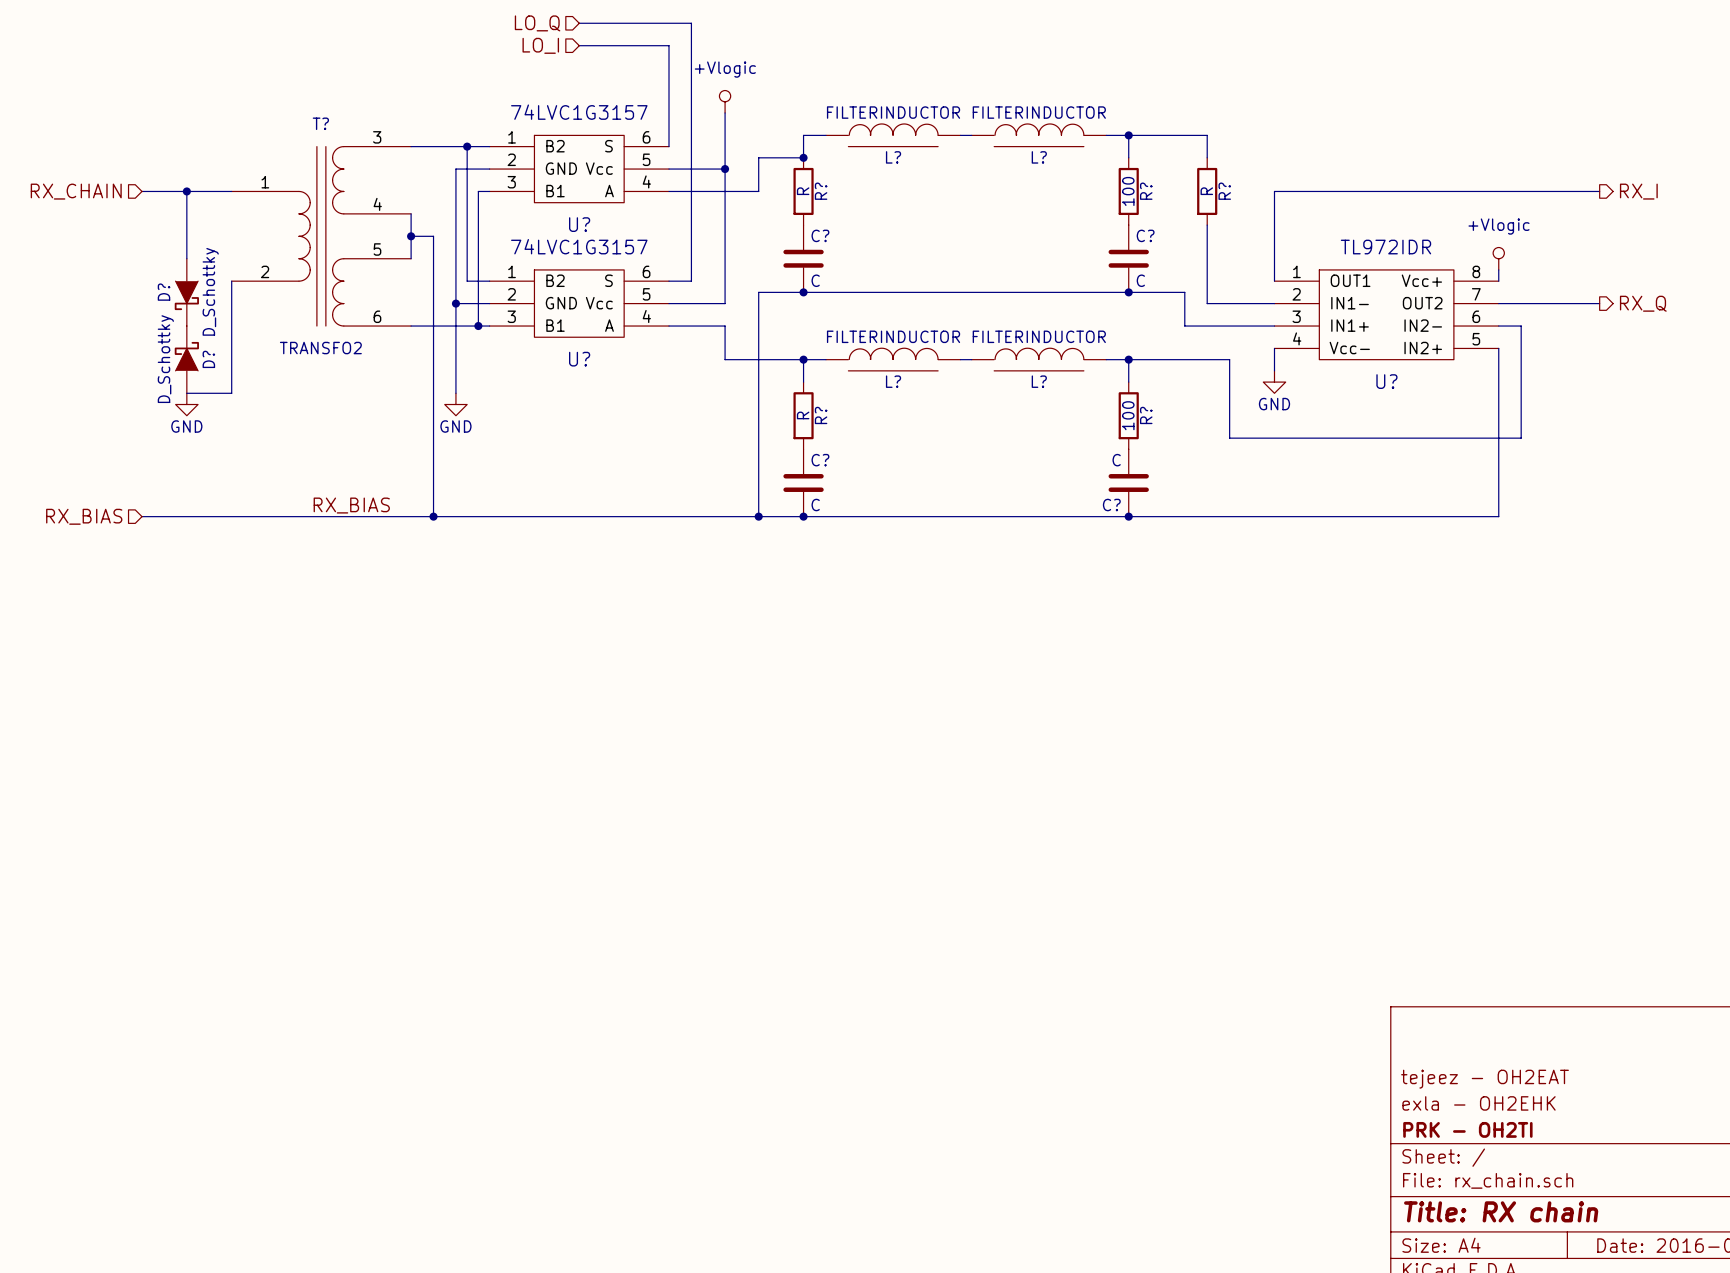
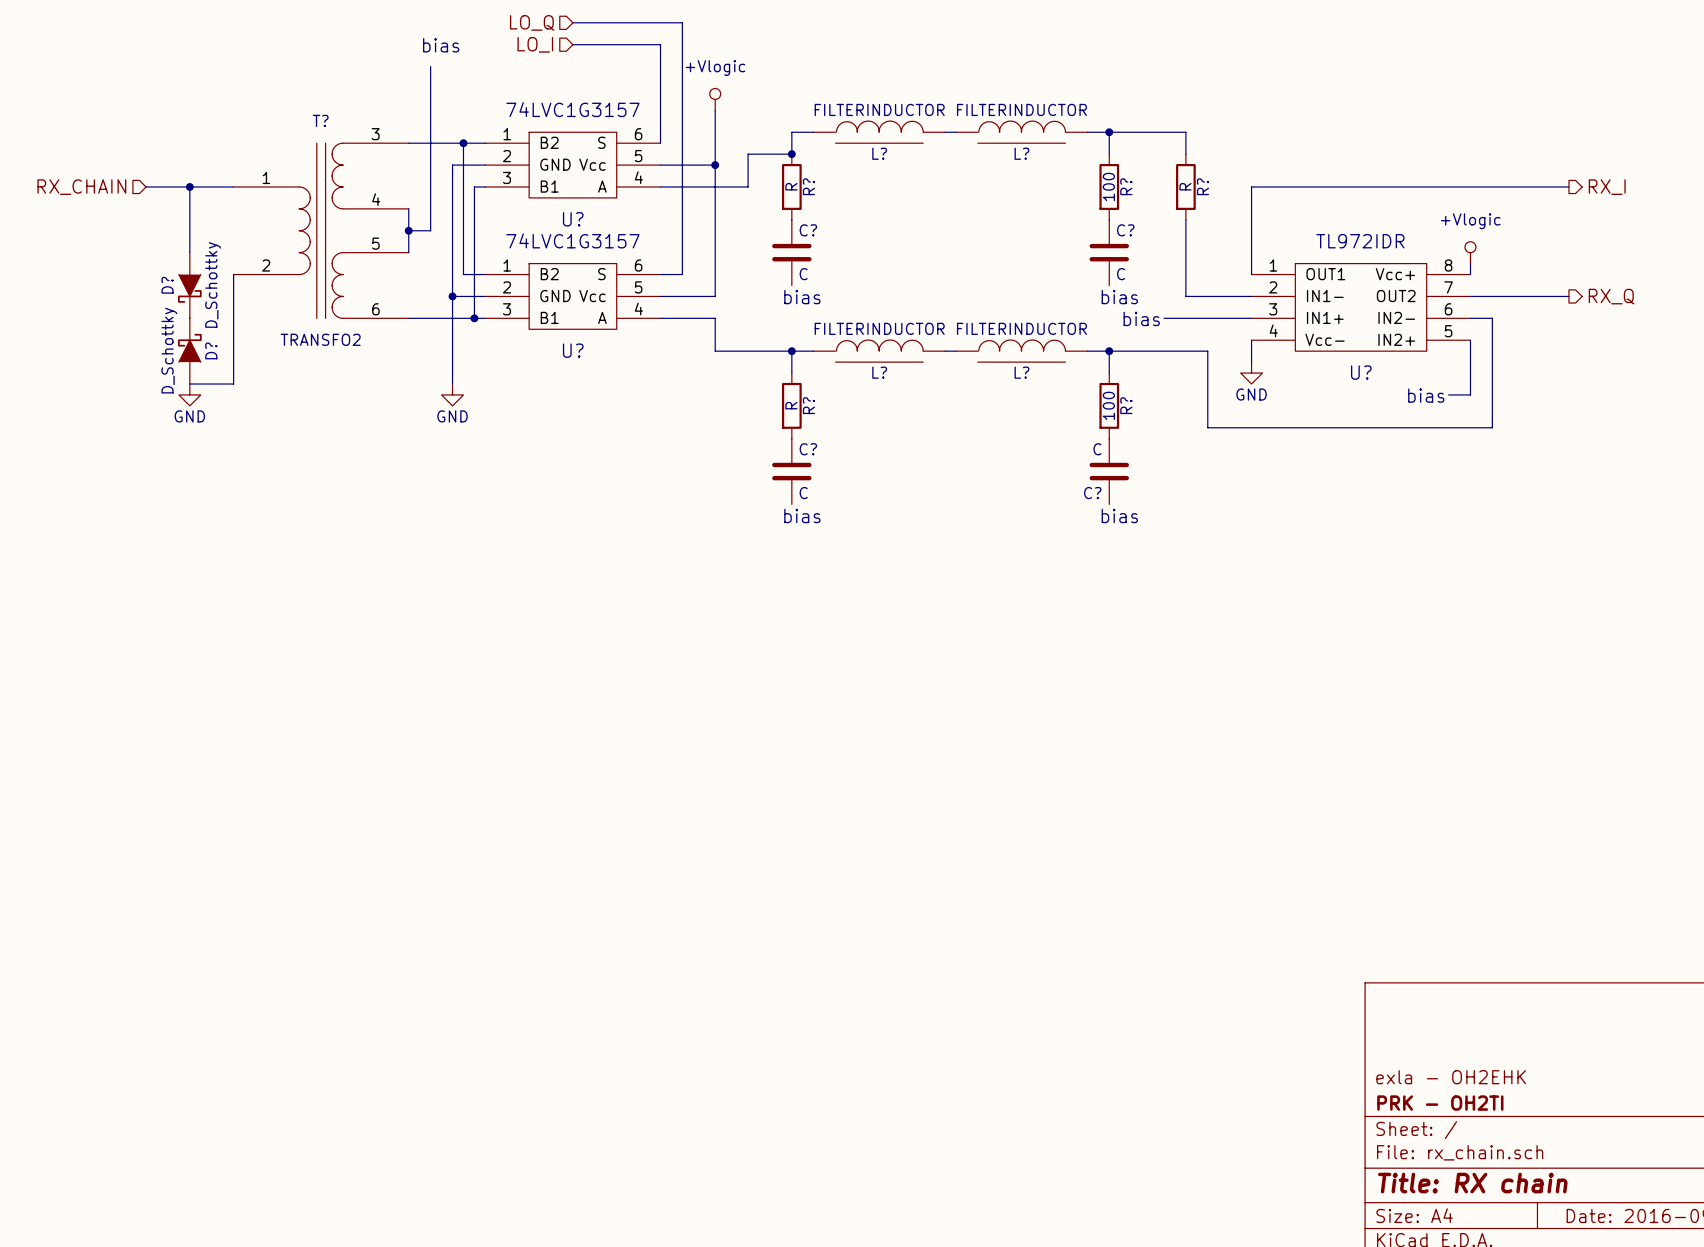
text: none -> bias (441, 45)
wire: (433, 236) (433, 516) -> (430, 230) (430, 66)
junction: (803, 292) -> none
junction: (1128, 292) -> none
text: none -> bias (802, 297)
text: none -> bias (1119, 297)
text: none -> bias (1141, 318)
wire: (1184, 326) (1184, 292) (758, 292) (758, 516) -> none
wire: (1498, 404) (1498, 516) (141, 516) -> (1470, 394) (1448, 394)
text: none -> bias (1426, 395)
label: RX_BIAS (351, 505) -> none
hierarchical label: RX_BIAS (84, 516) -> none
junction: (433, 516) -> none
junction: (758, 516) -> none
junction: (803, 516) -> none
junction: (1128, 516) -> none
text: none -> bias (802, 515)
text: none -> bias (1119, 515)
title block: tejeez - OH2EAT (1485, 1079) -> none

